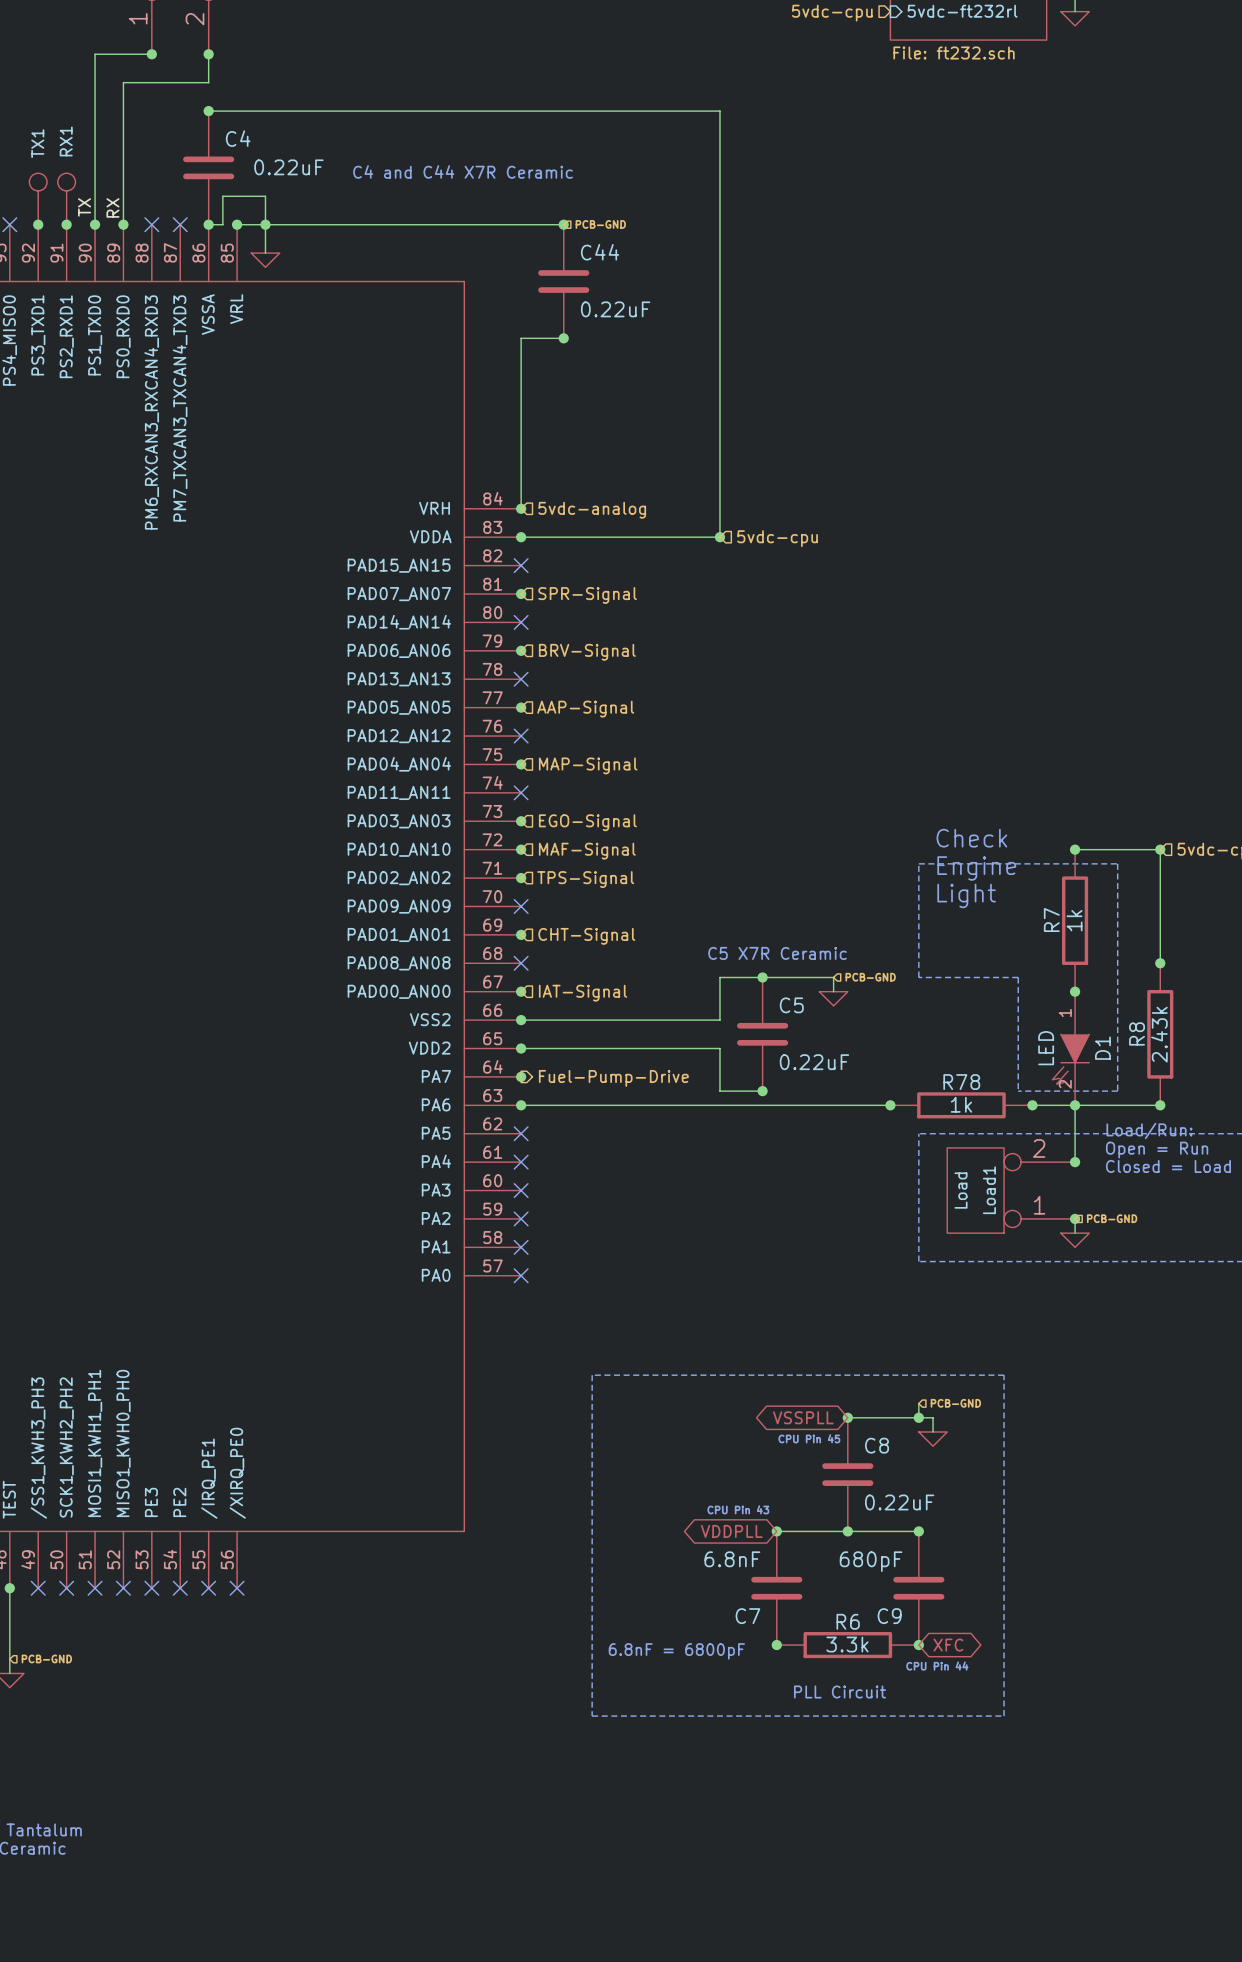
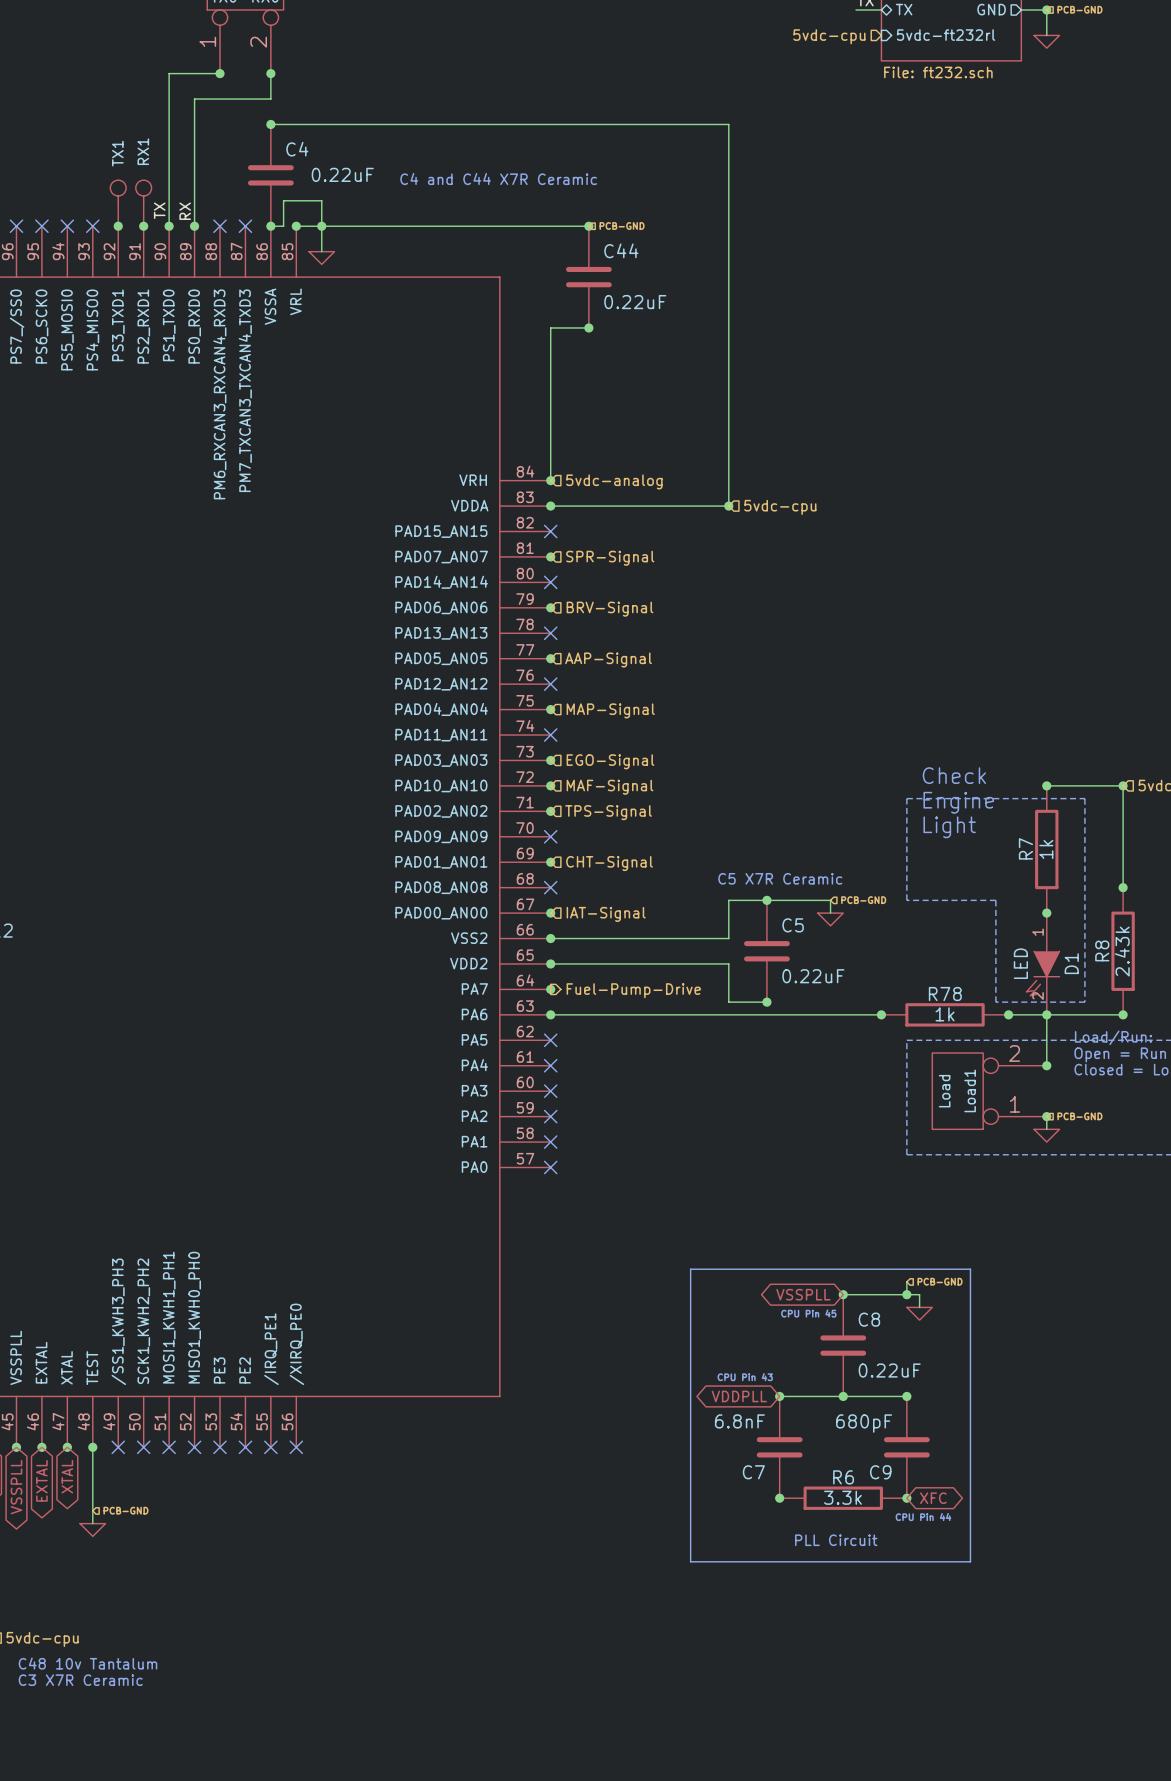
line: (592, 1375) (1004, 1375) (1004, 1716) (592, 1716) (592, 1375) -> none
bus: none -> (690, 1269) (690, 1561) (970, 1561) (970, 1269) (690, 1269)
text: 6.8nF = 6800pF (676, 1651) -> none

